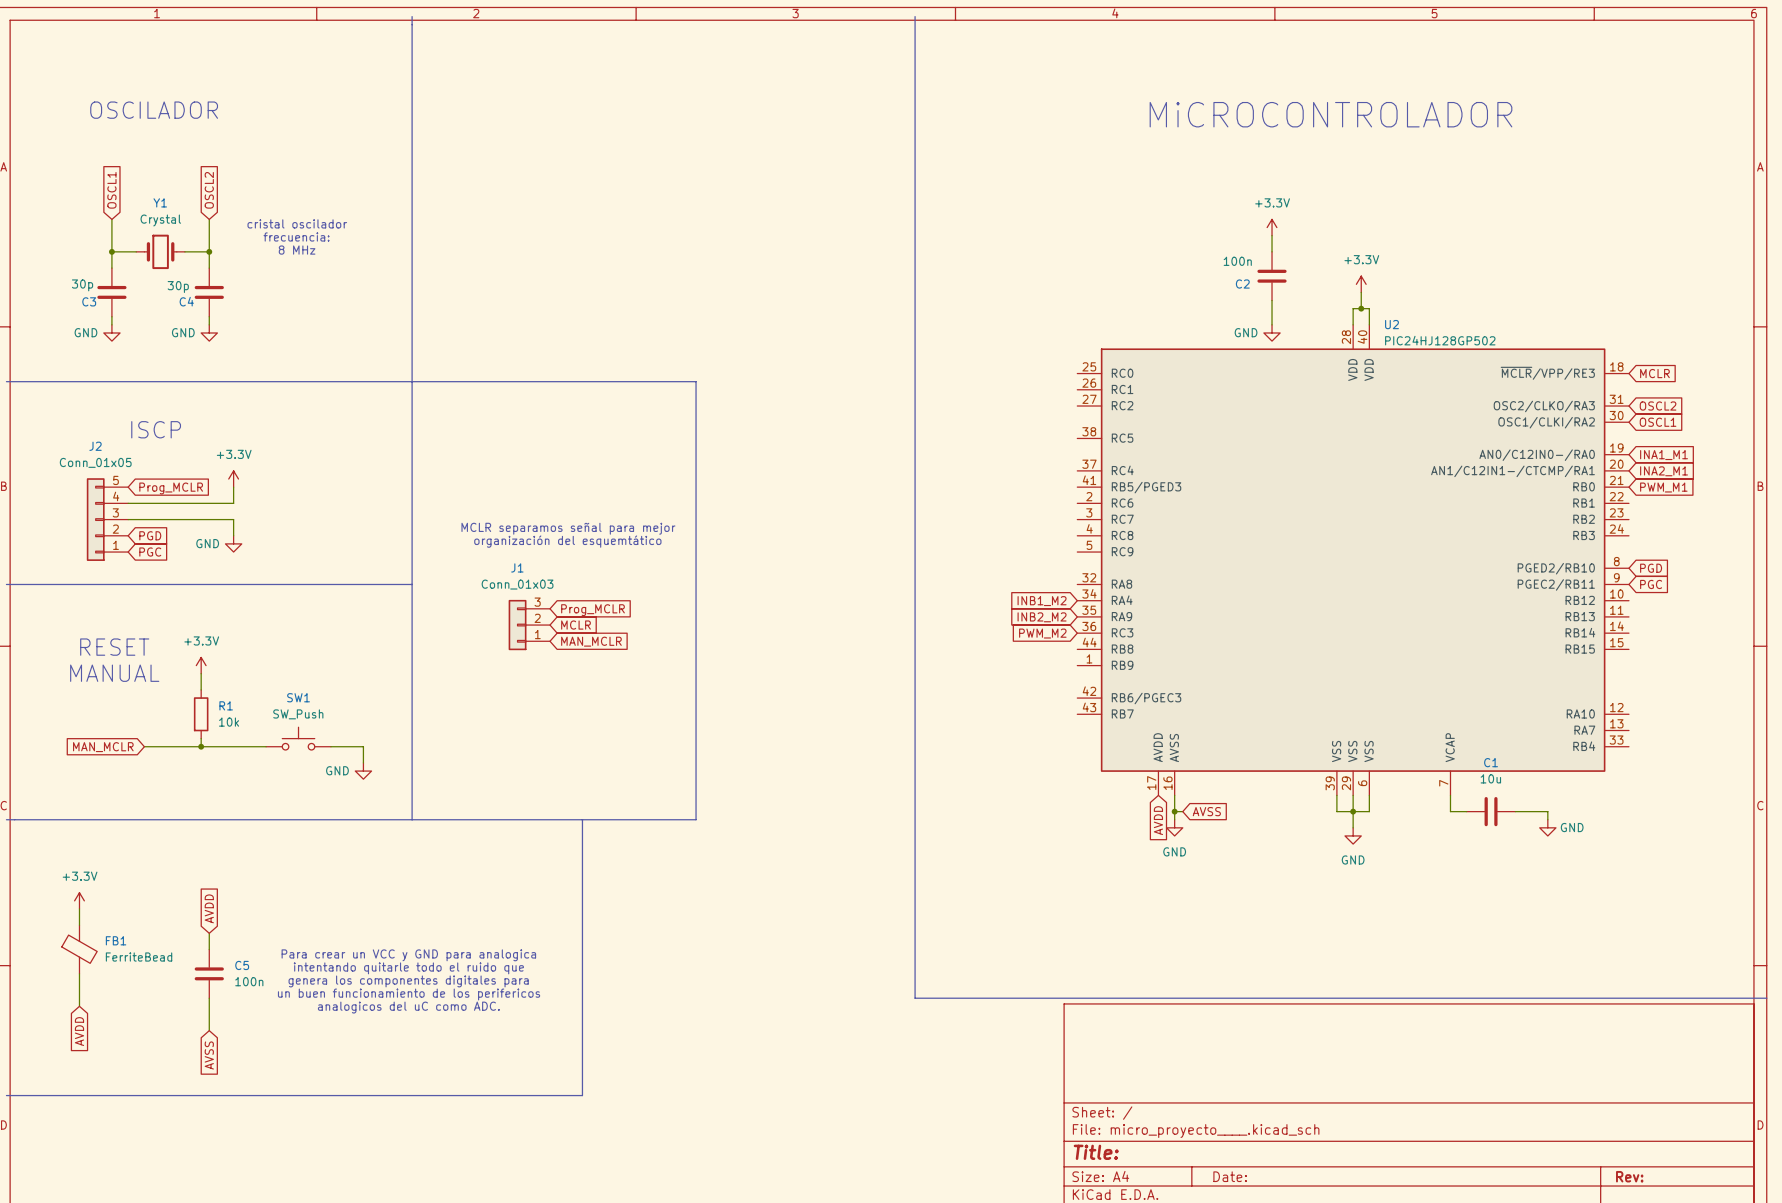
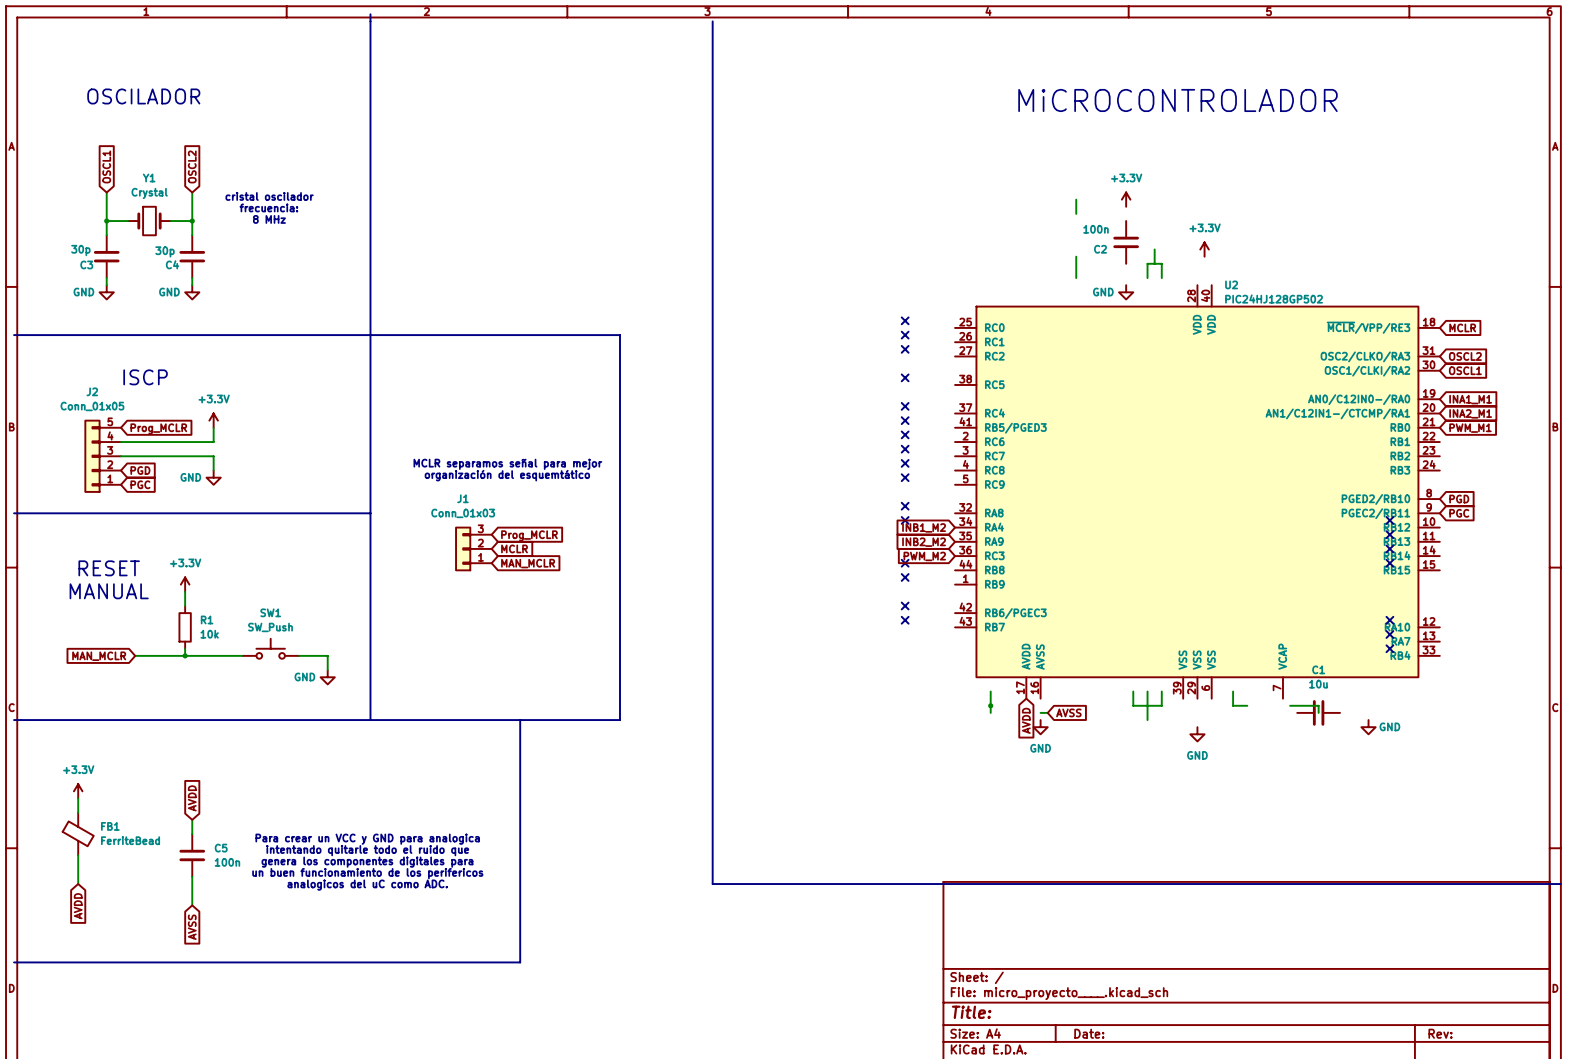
line: (915, 16) (915, 998) (1766, 998) -> none
line: none -> (712, 21) (712, 884) (1561, 884)
wire: (1272, 235) (1272, 251) -> (1076, 199) (1076, 213)
wire: (1361, 292) (1361, 308) -> (1154, 249) (1154, 263)
wire: (1272, 300) (1272, 324) -> (1076, 256) (1076, 278)
junction: (1361, 308) -> none
wire: (1353, 324) (1353, 308) (1369, 308) (1369, 324) -> (1147, 278) (1147, 263) (1161, 263) (1161, 278)
no-connect mark: none -> (905, 320)
no-connect mark: none -> (905, 335)
no-connect mark: none -> (905, 349)
no-connect mark: none -> (905, 377)
no-connect mark: none -> (905, 406)
no-connect mark: none -> (905, 420)
no-connect mark: none -> (905, 434)
no-connect mark: none -> (905, 449)
no-connect mark: none -> (905, 463)
no-connect mark: none -> (905, 477)
no-connect mark: none -> (905, 506)
no-connect mark: none -> (905, 520)
no-connect mark: none -> (1389, 520)
no-connect mark: none -> (1389, 534)
no-connect mark: none -> (1389, 548)
no-connect mark: none -> (905, 563)
no-connect mark: none -> (1389, 563)
no-connect mark: none -> (905, 577)
no-connect mark: none -> (905, 605)
no-connect mark: none -> (905, 620)
no-connect mark: none -> (1389, 620)
no-connect mark: none -> (1389, 634)
no-connect mark: none -> (1389, 648)
wire: (1174, 795) (1174, 819) -> (990, 691) (990, 712)
wire: (1336, 795) (1336, 811) (1369, 811) (1369, 795) -> (1133, 691) (1133, 705) (1161, 705) (1161, 691)
wire: (1353, 795) (1353, 827) -> (1147, 691) (1147, 720)
wire: (1450, 795) (1450, 811) (1466, 811) -> (1233, 691) (1233, 705) (1247, 705)
junction: none -> (990, 705)
junction: (1174, 811) -> none
junction: (1353, 811) -> none
wire: (1515, 811) (1547, 811) (1547, 819) -> (1290, 705) (1318, 705) (1318, 712)

